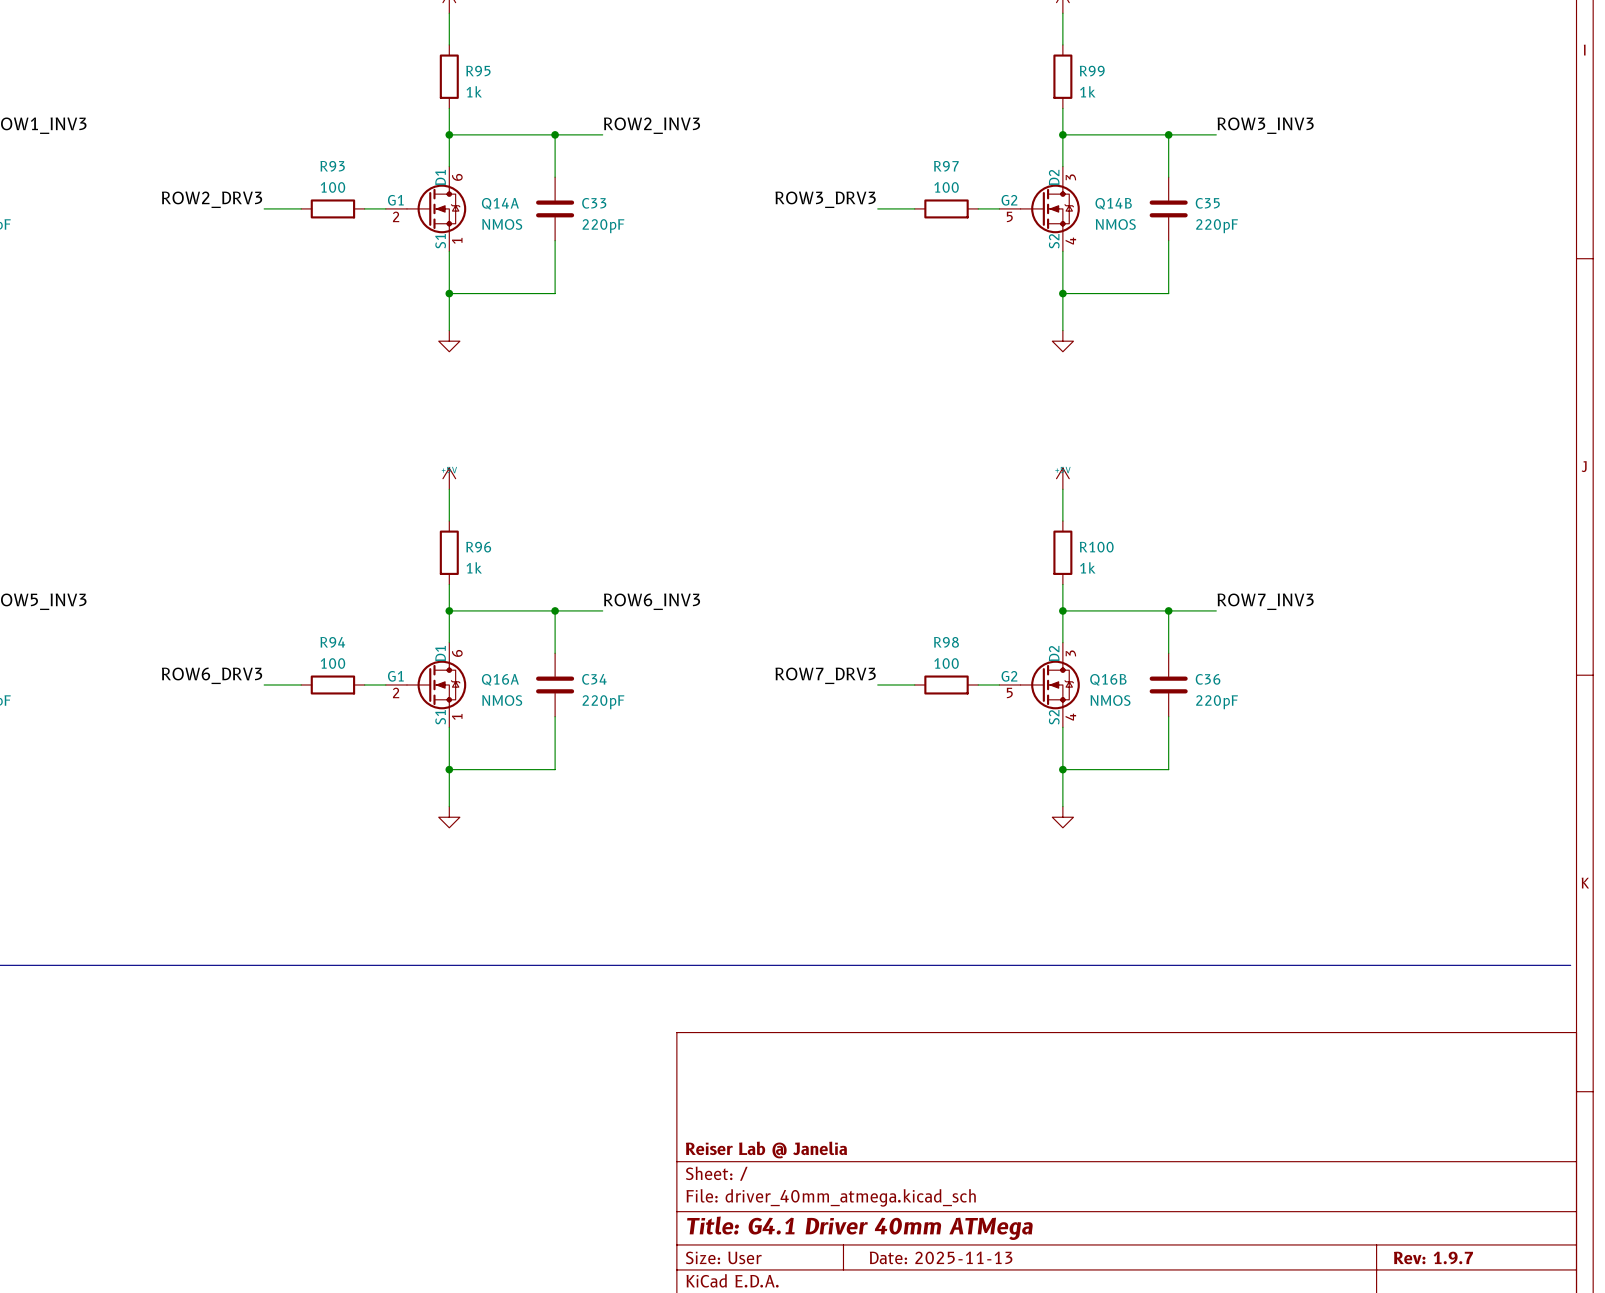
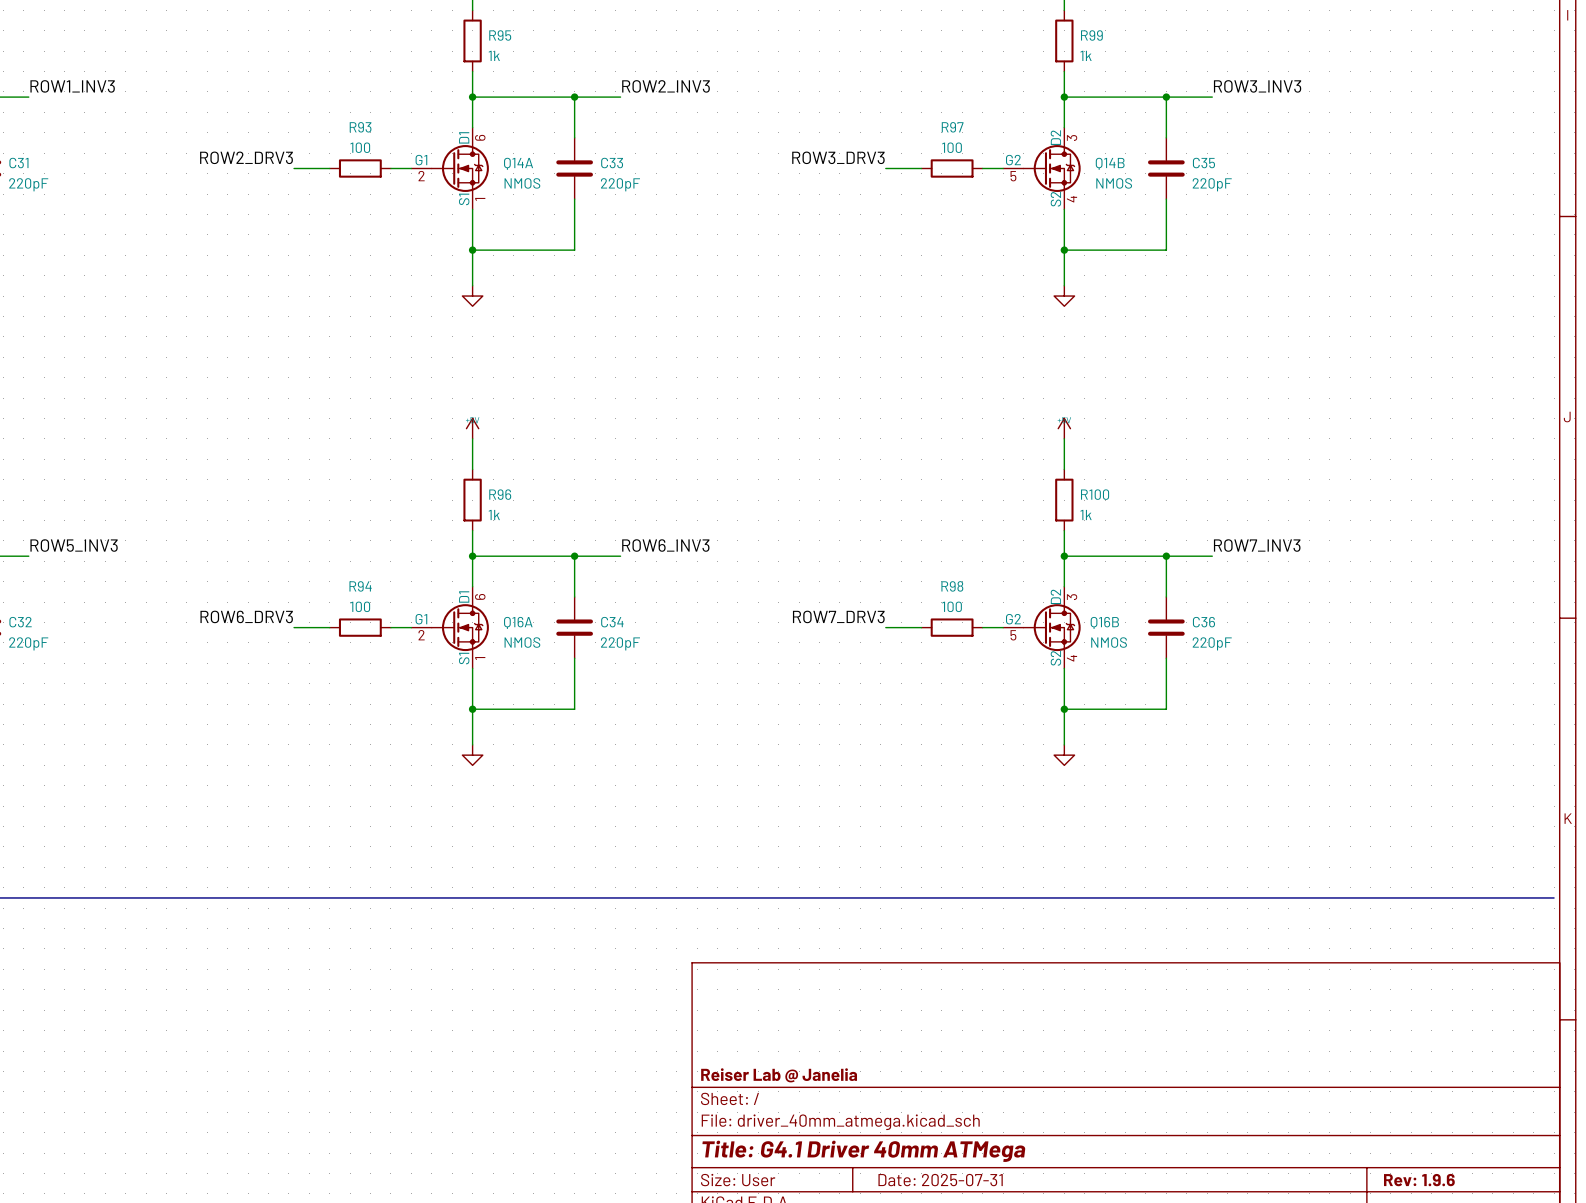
title block: Date: 2025-11-13 (941, 1257) -> Date: 2025-07-31 (940, 1180)
title block: Rev: 1.9.7 (1433, 1257) -> Rev: 1.9.6 (1419, 1180)

